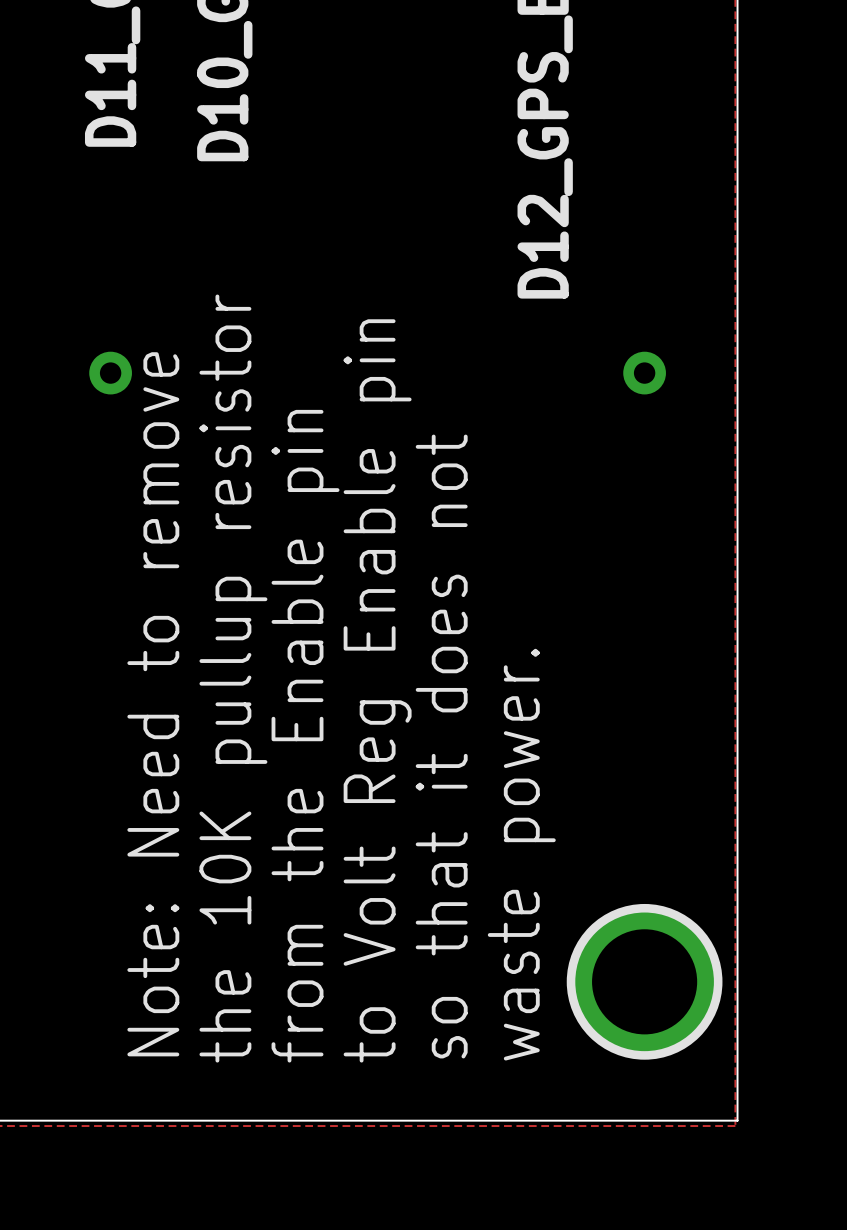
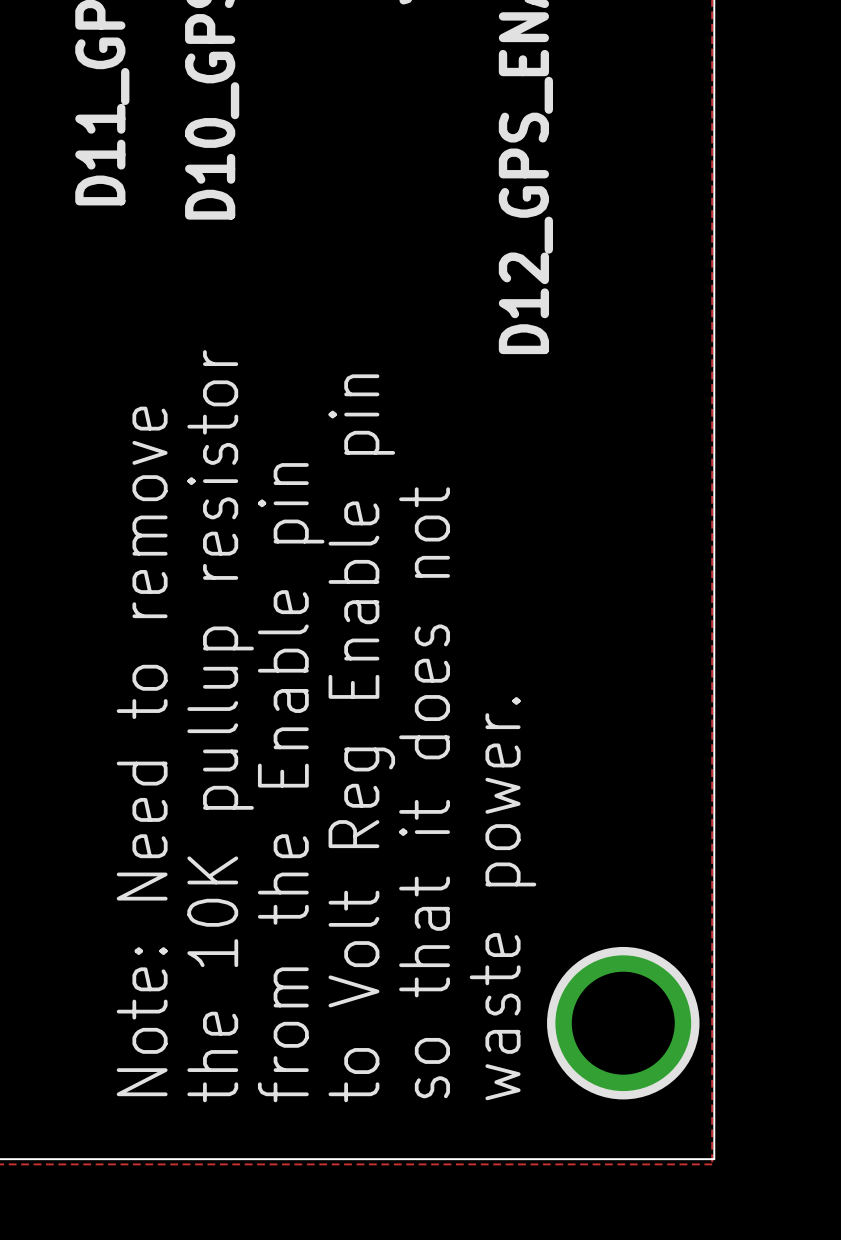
via: (110, 373) -> none
via: (644, 373) -> none

